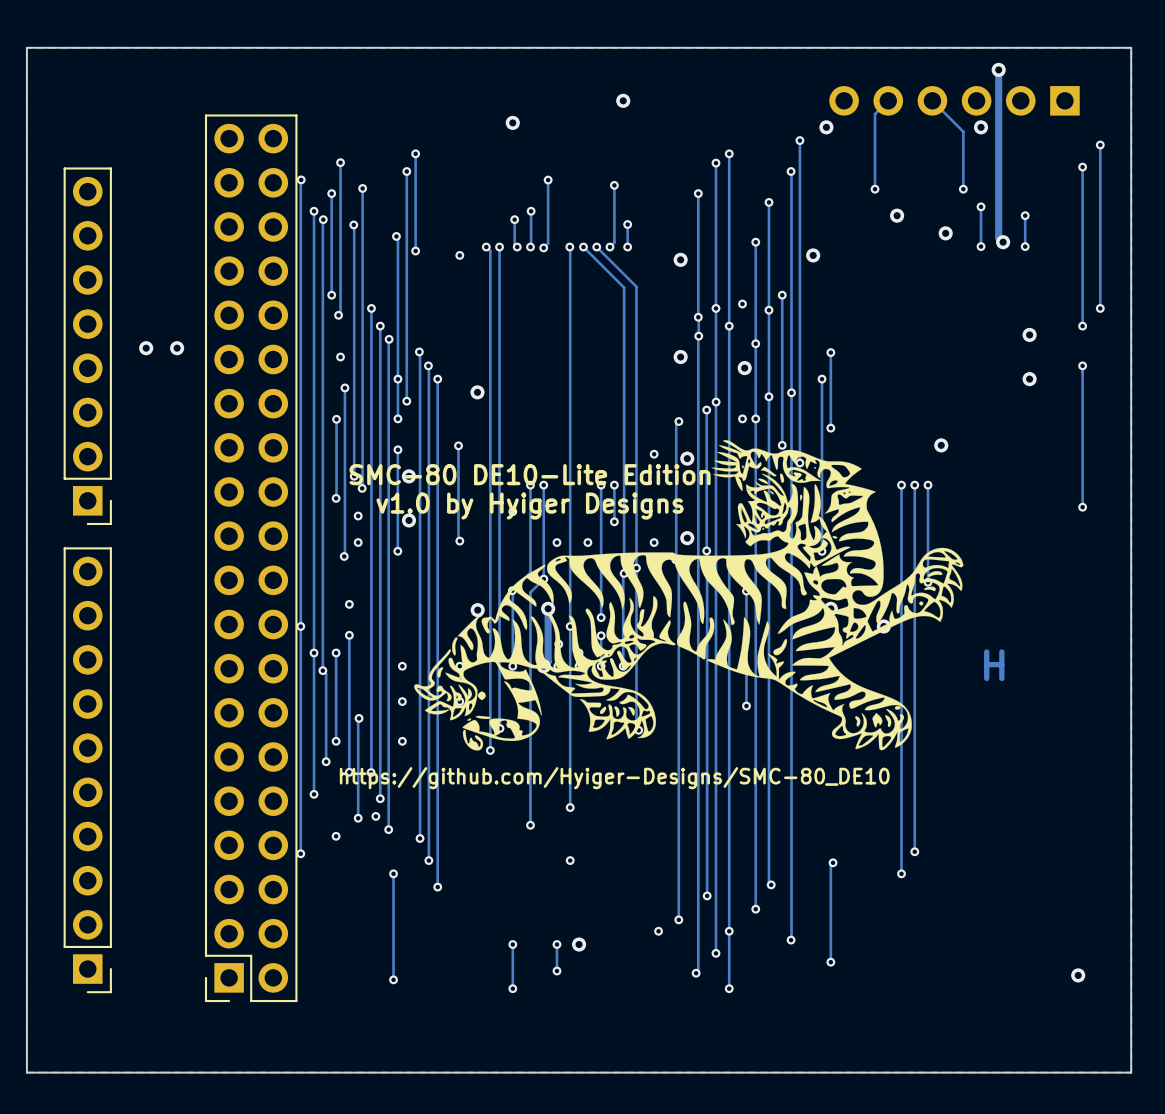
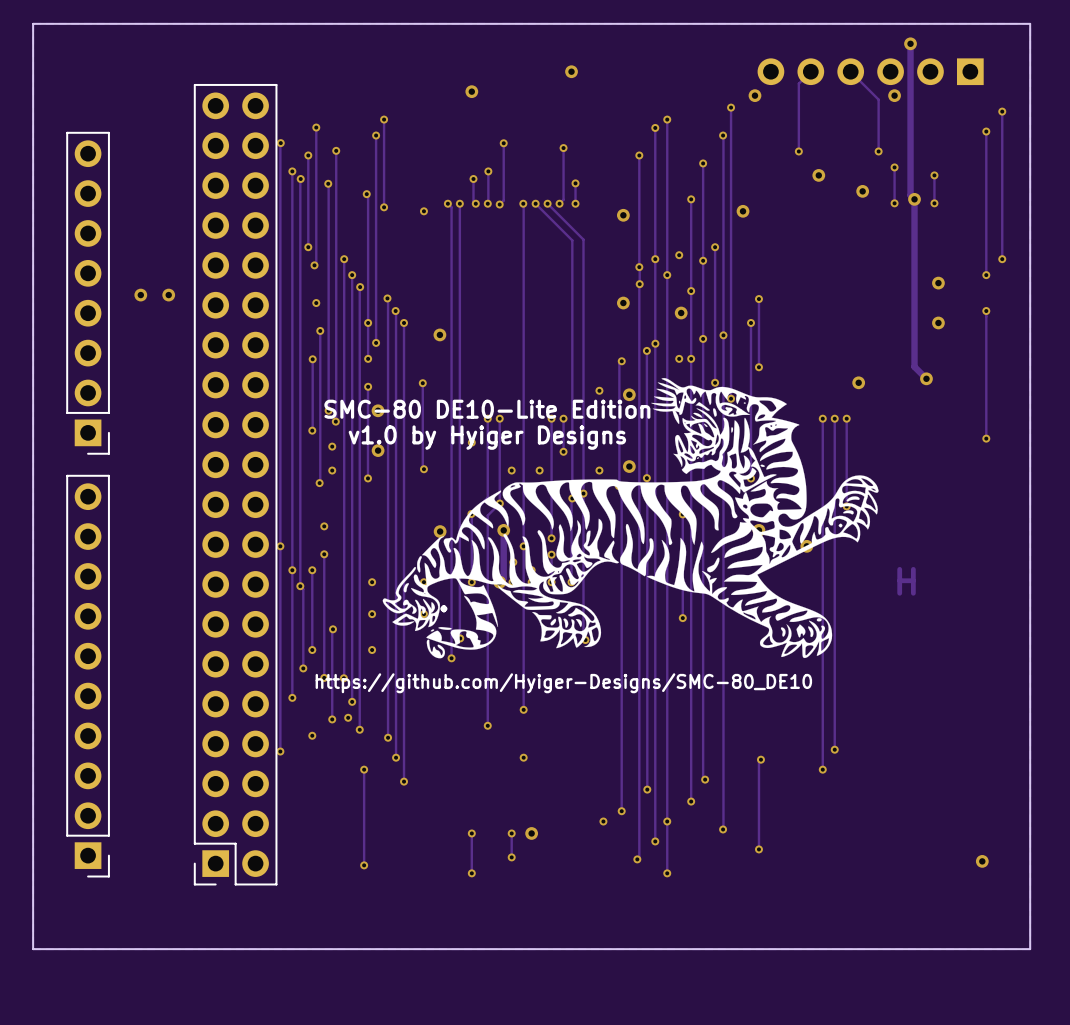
track: none -> (914, 199) (914, 366) (926, 378)
via: none -> (926, 378)

